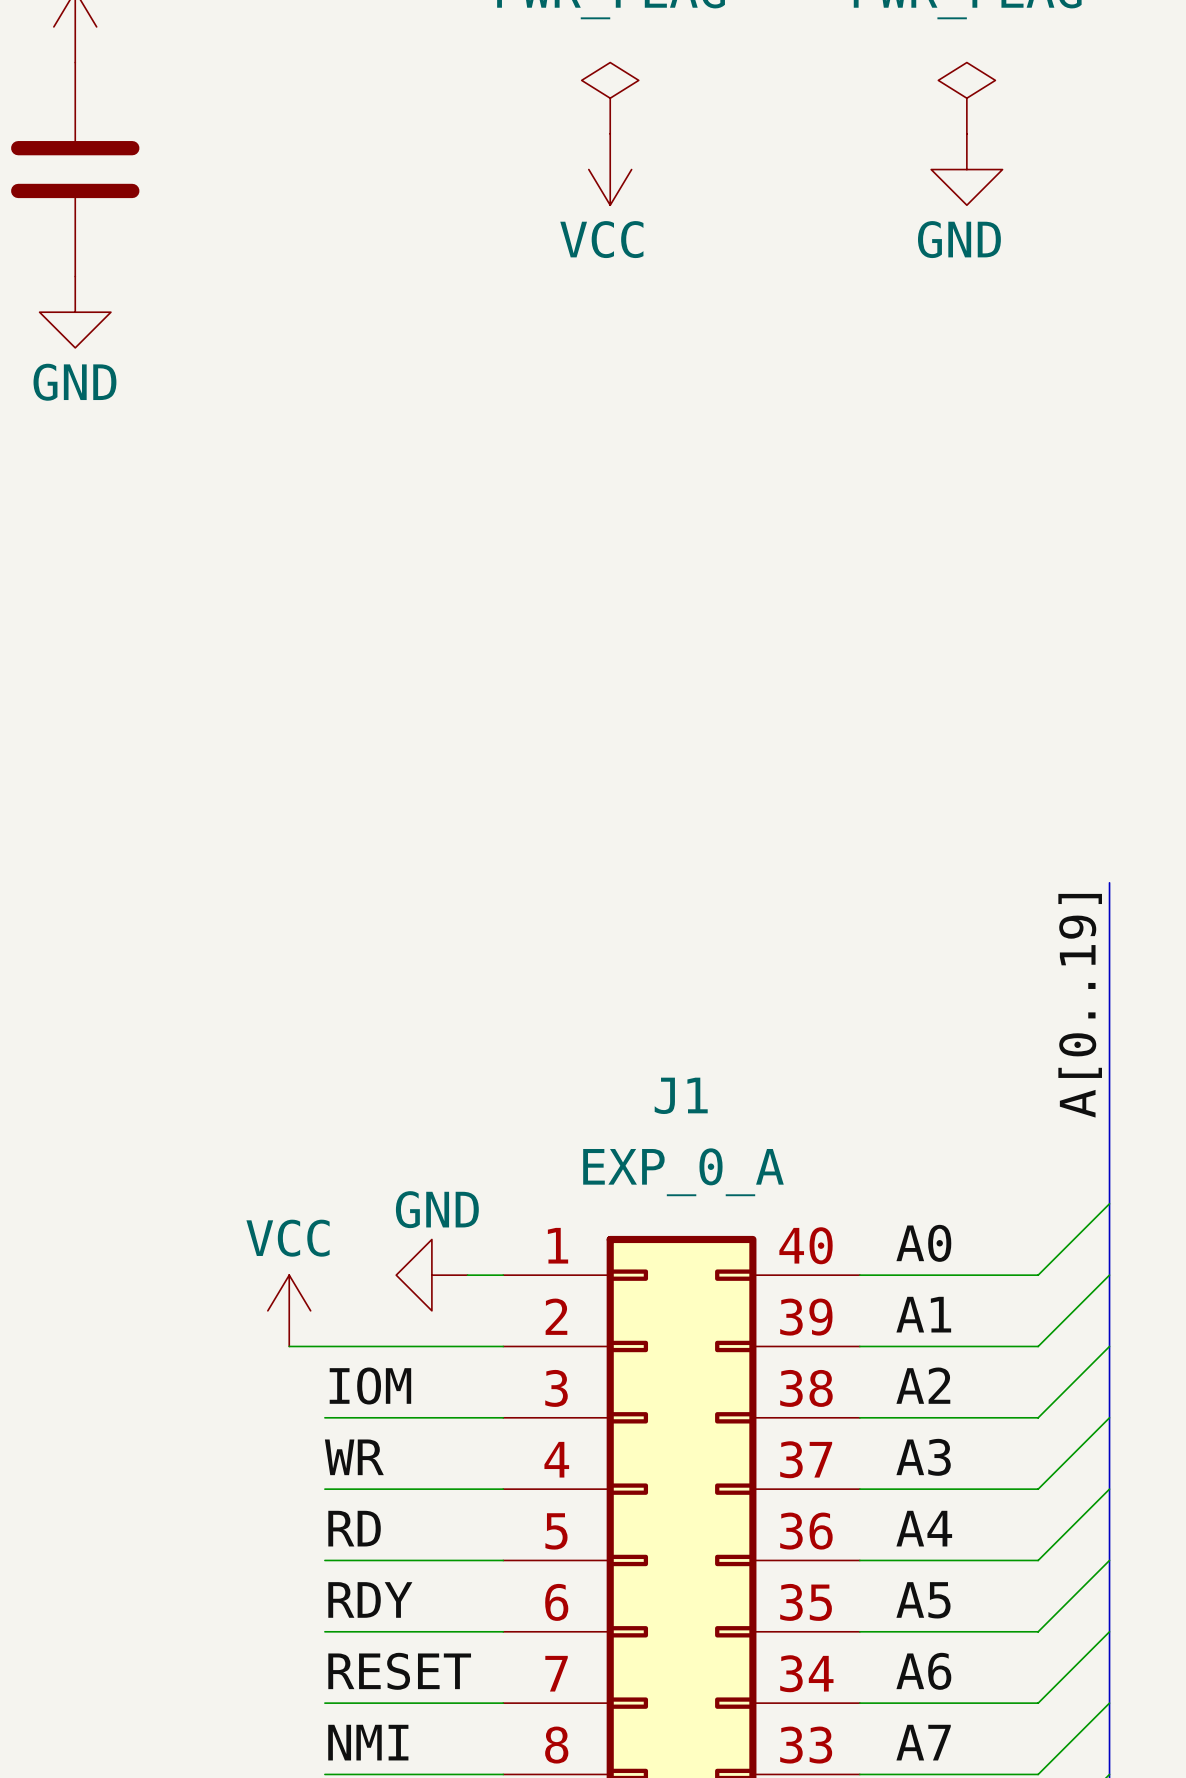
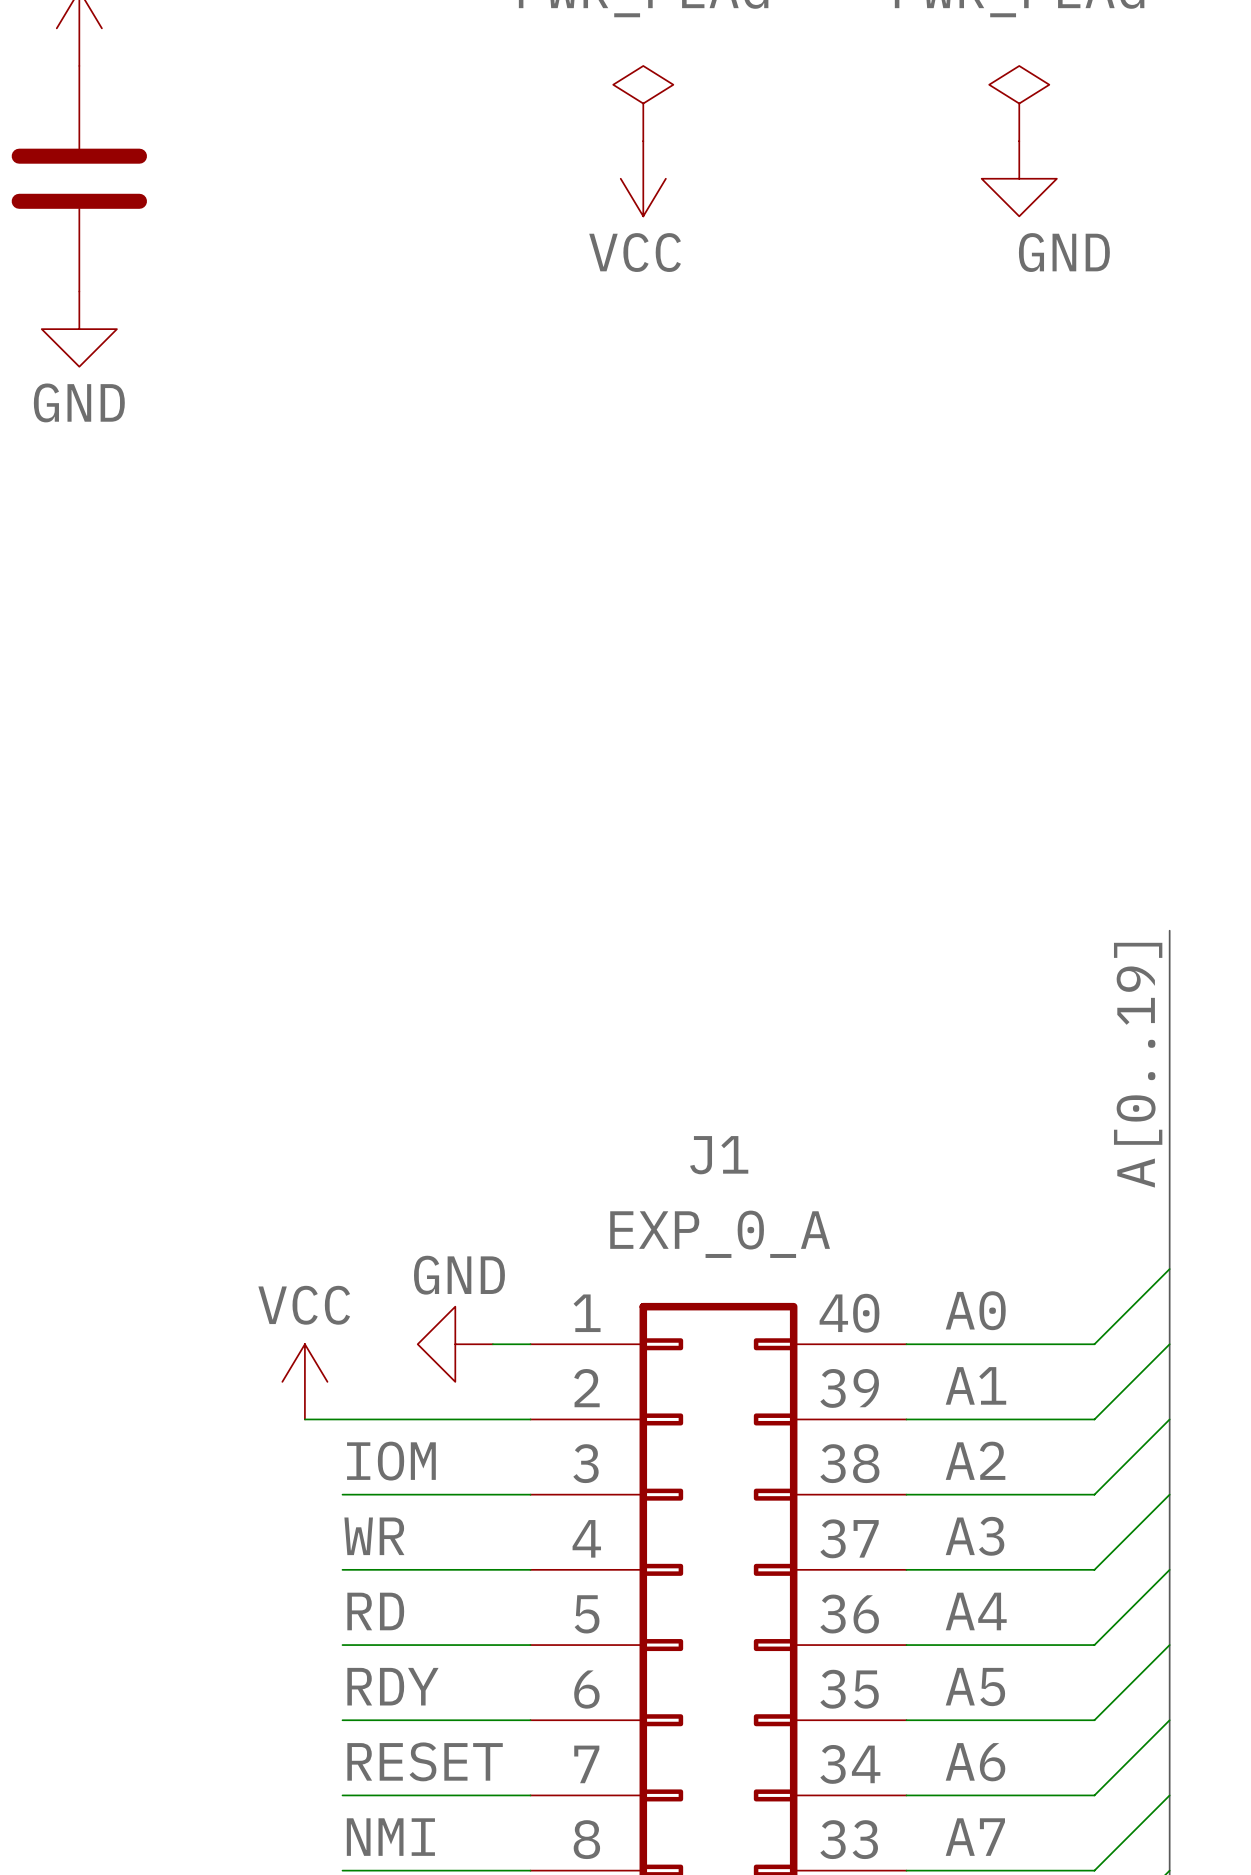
power symbol text position: GND (959, 239) -> GND (1064, 252)

